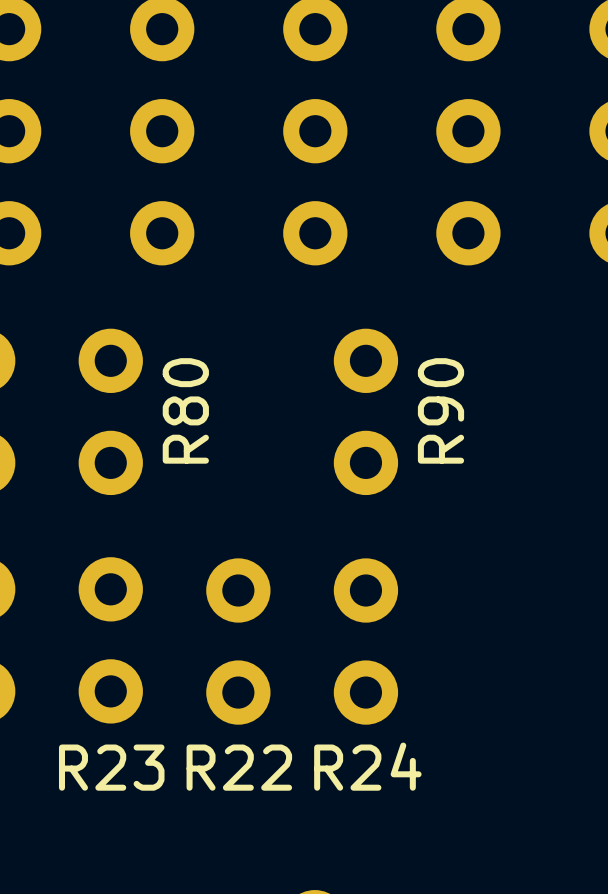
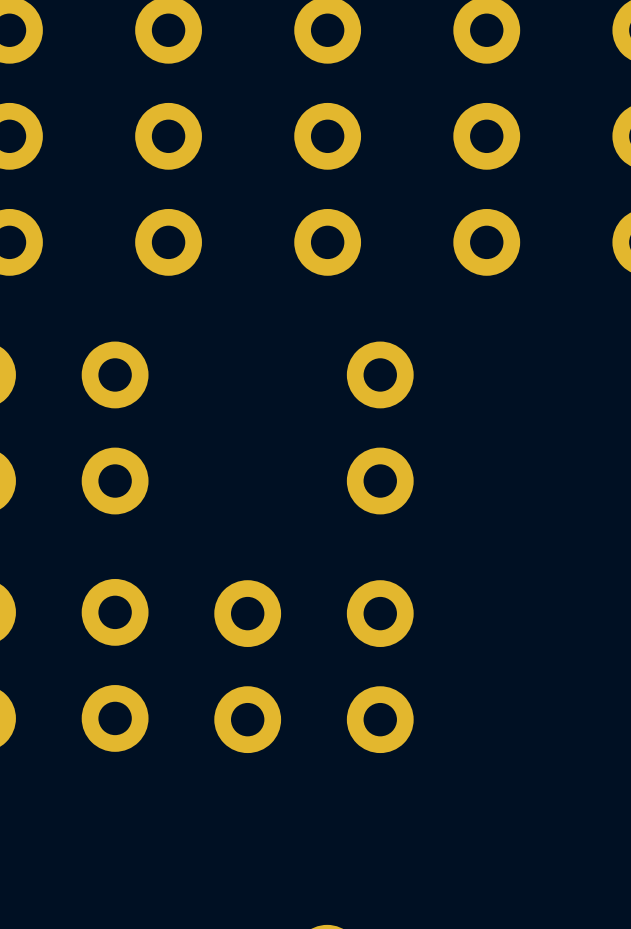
R80 name: R80 (185, 410) -> none
R90 name: R90 (441, 410) -> none
R24 name: R24 (367, 766) -> none
R23 name: R23 (111, 767) -> none
R22 name: R22 (239, 767) -> none

